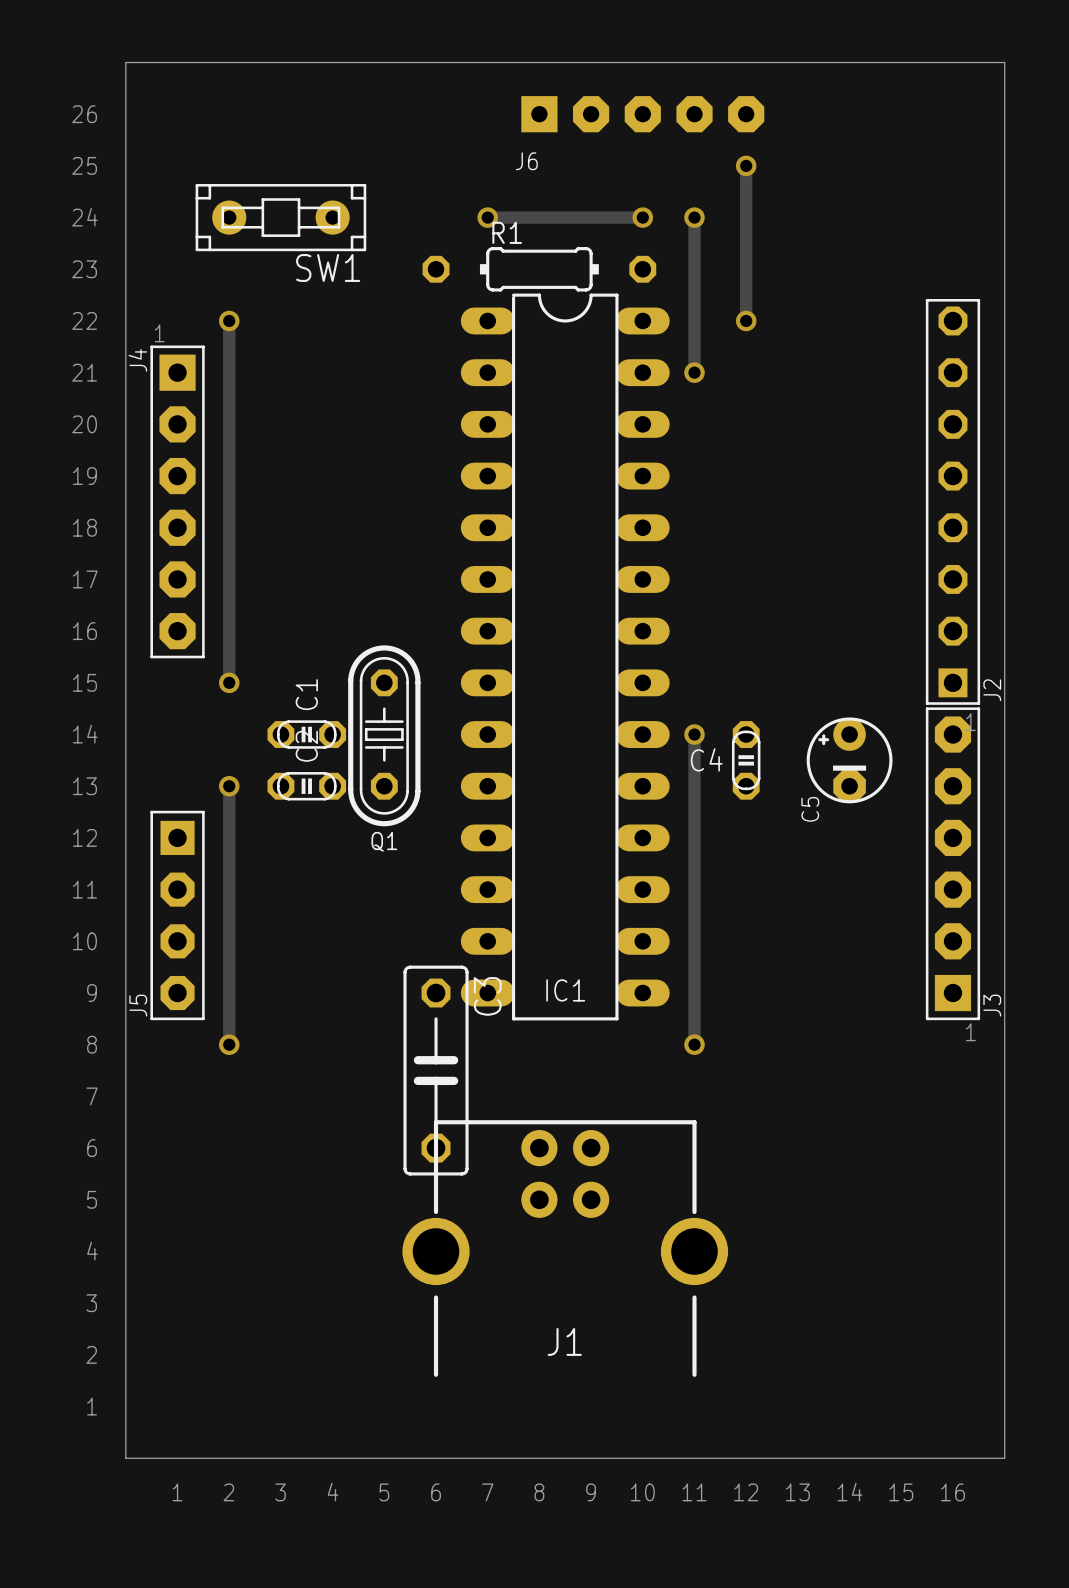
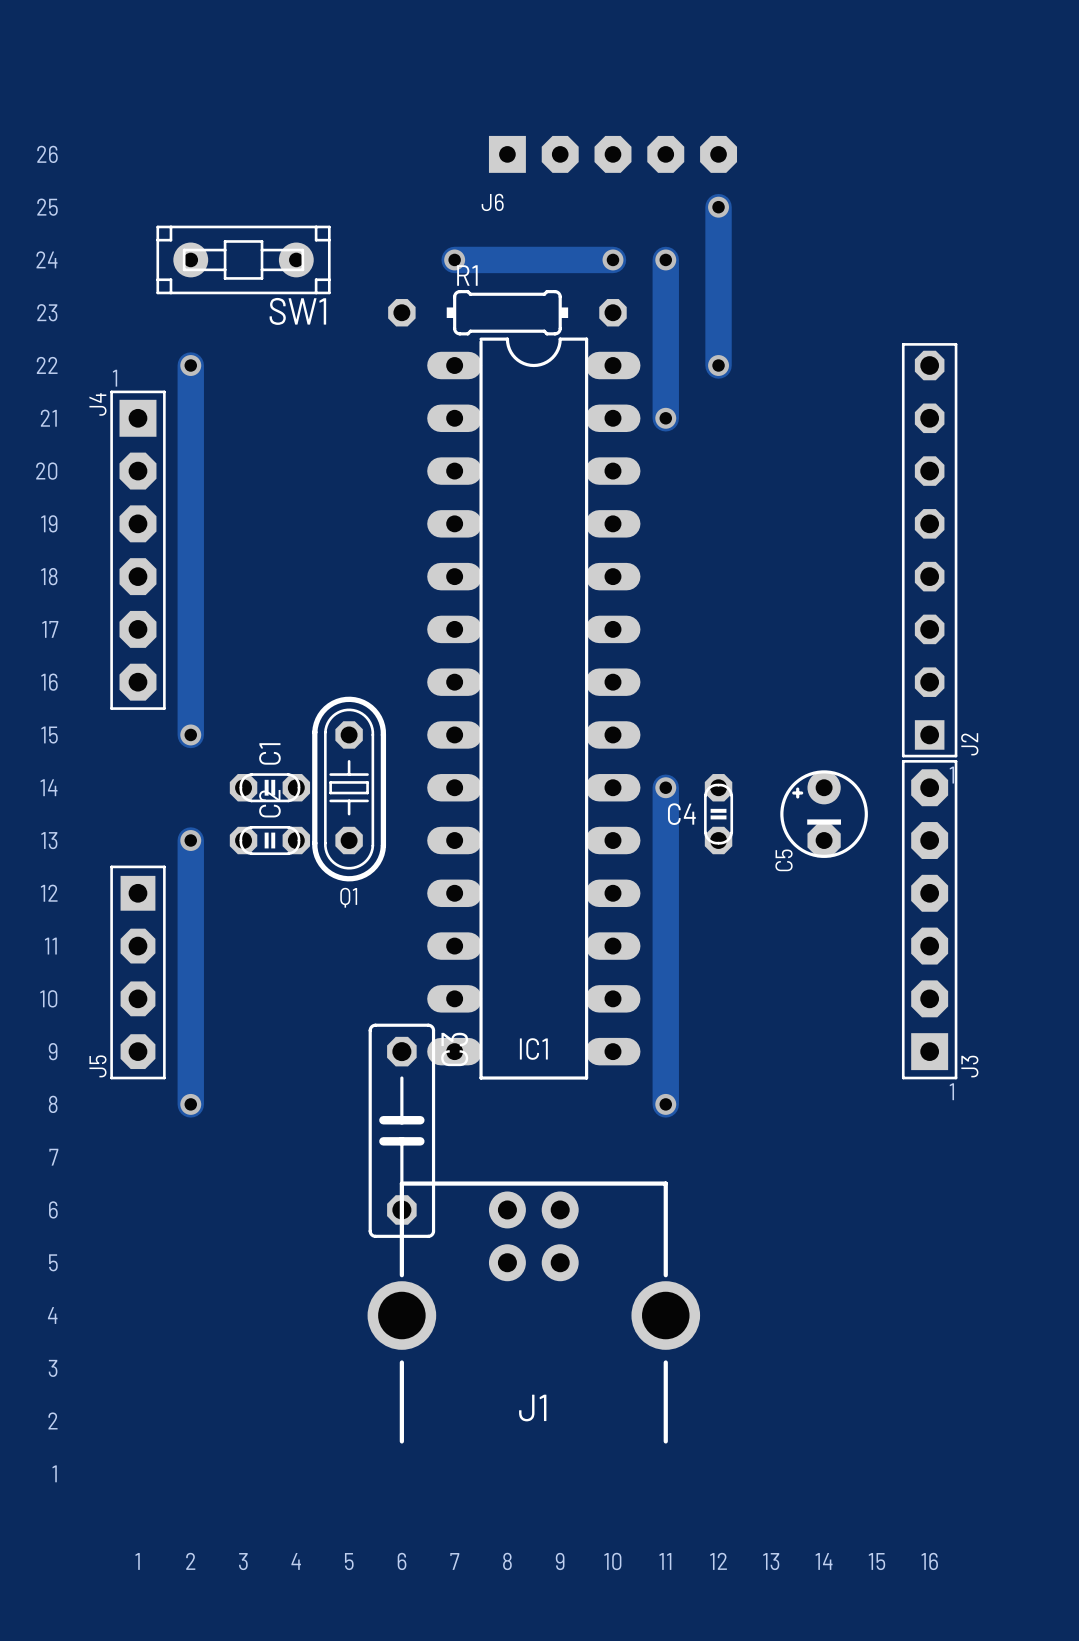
board edge: (125, 62) (1004, 62) (1004, 1458) (125, 1458) (125, 62) -> none
track width: thin (746, 165) (746, 320) -> thick (718, 207) (718, 365)
track width: thin (487, 217) (642, 217) -> thick (454, 259) (612, 259)
track width: thin (694, 217) (694, 372) -> thick (665, 259) (665, 418)
track width: thin (229, 320) (229, 682) -> thick (190, 365) (190, 734)
track width: thin (694, 734) (694, 1044) -> thick (665, 787) (665, 1104)
track width: thin (229, 786) (229, 1044) -> thick (190, 840) (190, 1104)

